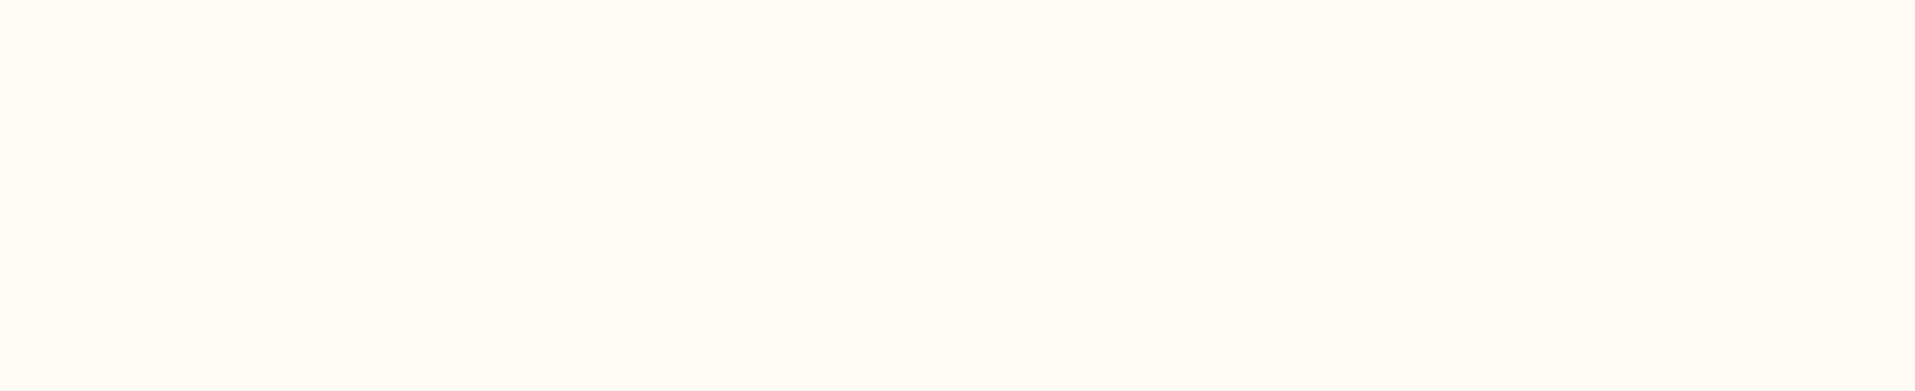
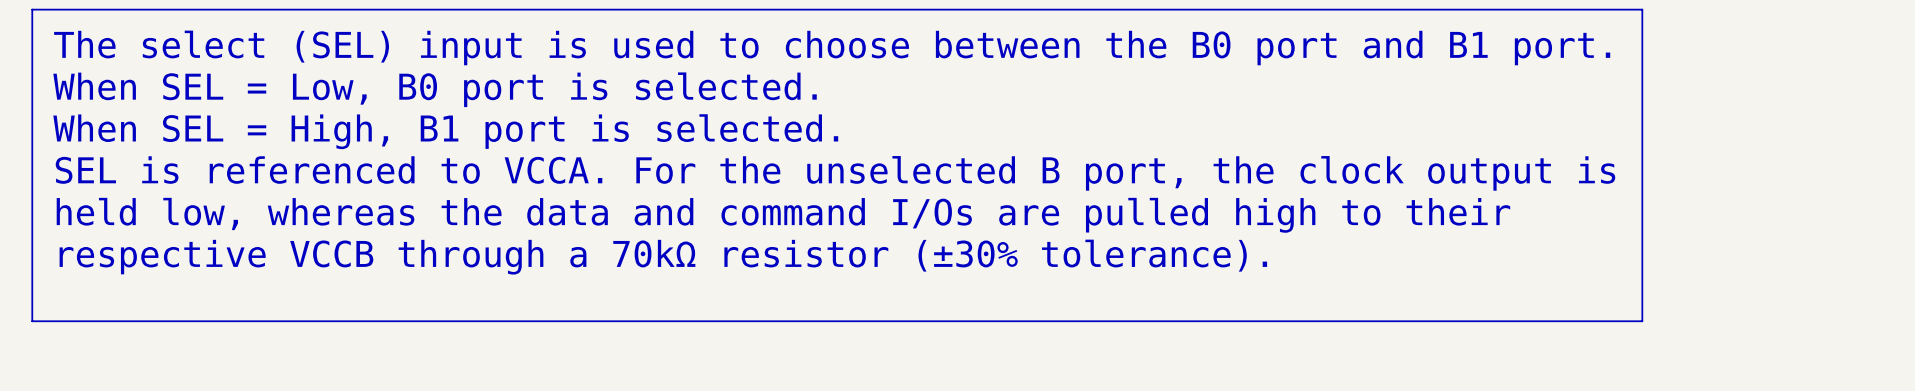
line: none -> (32, 9) (1642, 9) (1642, 321) (32, 321) (32, 9)
text: none -> The select (SEL) input is used to choose between the B0 port and B1 port. (832, 47)
text: none -> When SEL = Low, B0 port is selected. (435, 89)
text: none -> When SEL = High, B1 port is selected. (445, 131)
text: none -> SEL is referenced to VCCA. For the unselected B port, the clock output is (835, 173)
text: none -> held low, whereas the data and command I/Os are pulled high to their (783, 215)
text: none -> respective VCCB through a 70kΩ resistor (±30% tolerance). (663, 257)

